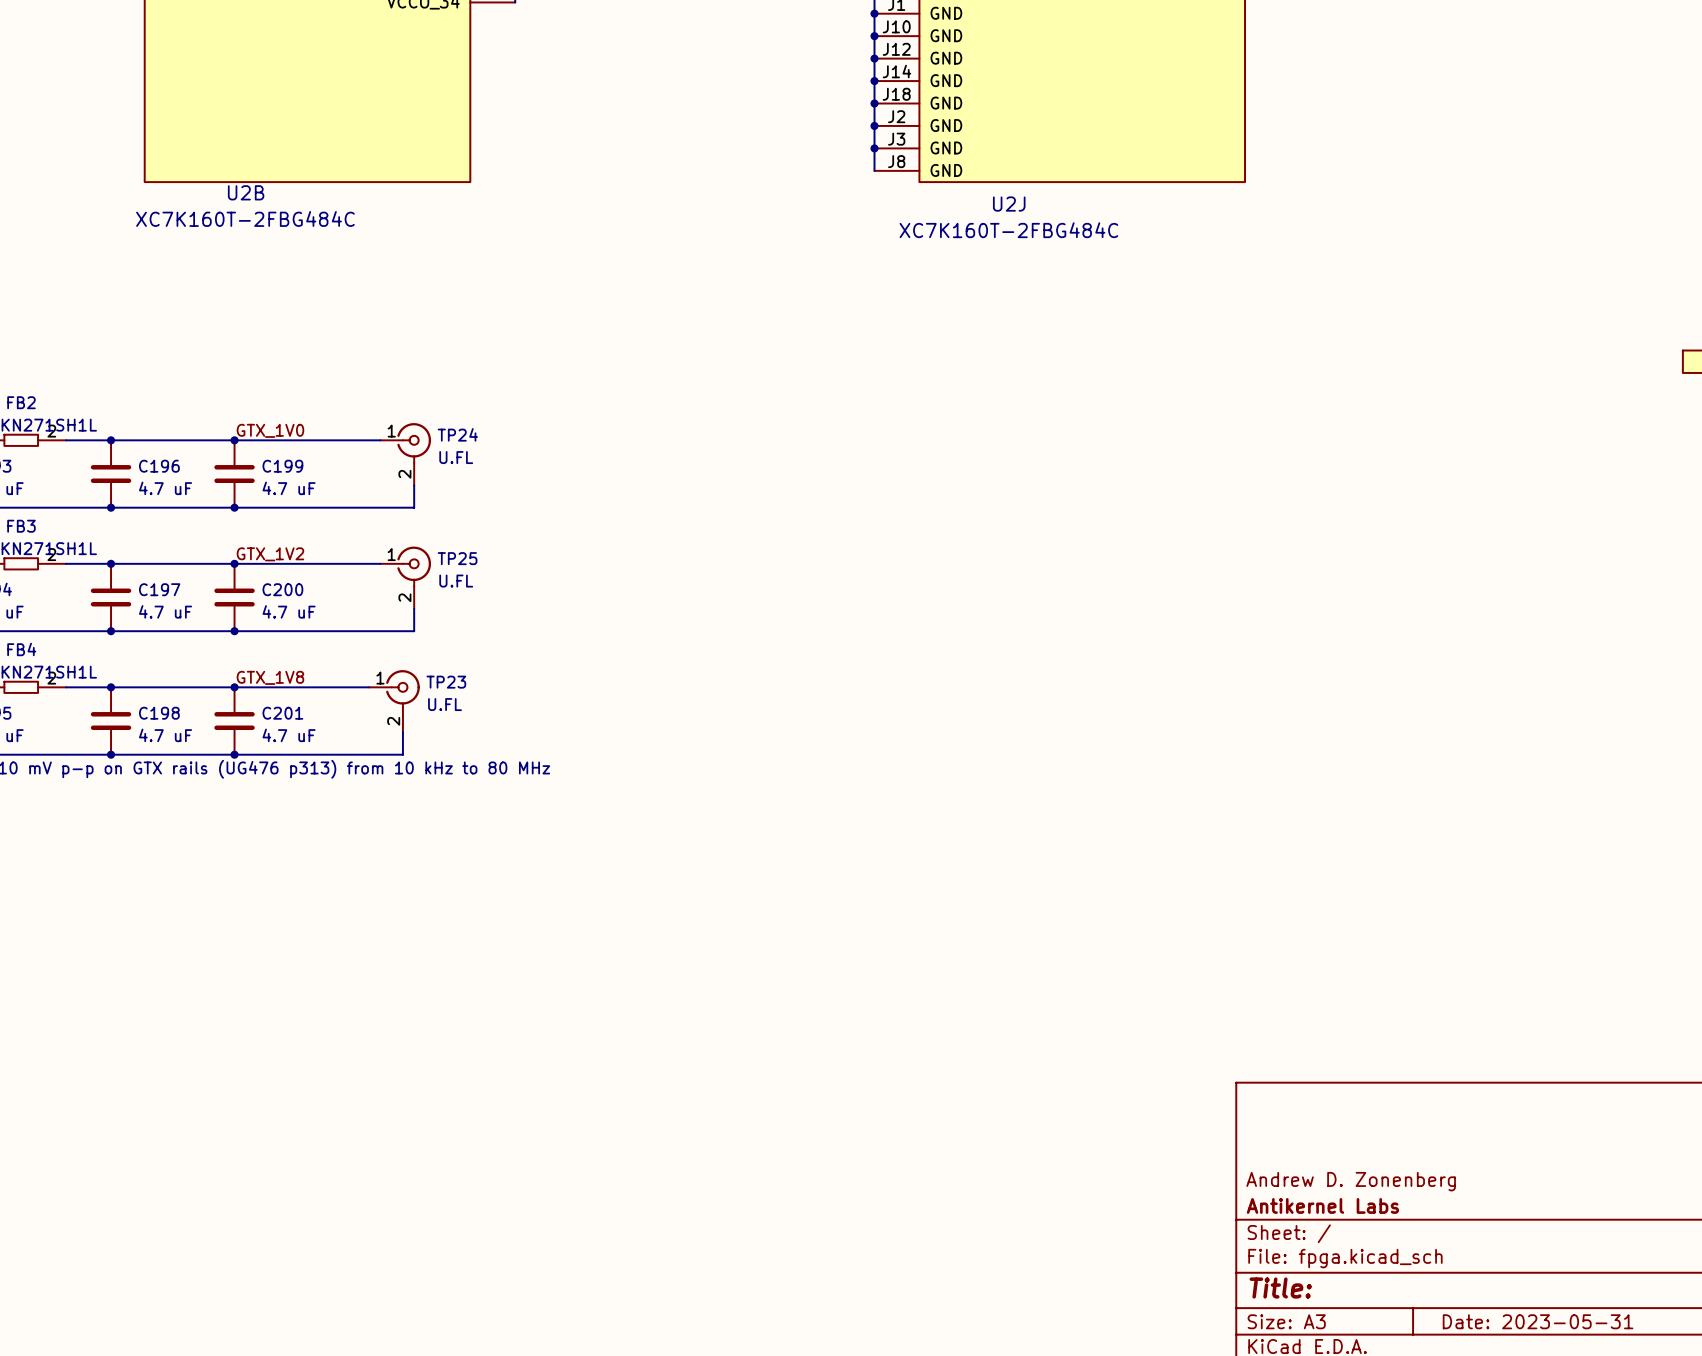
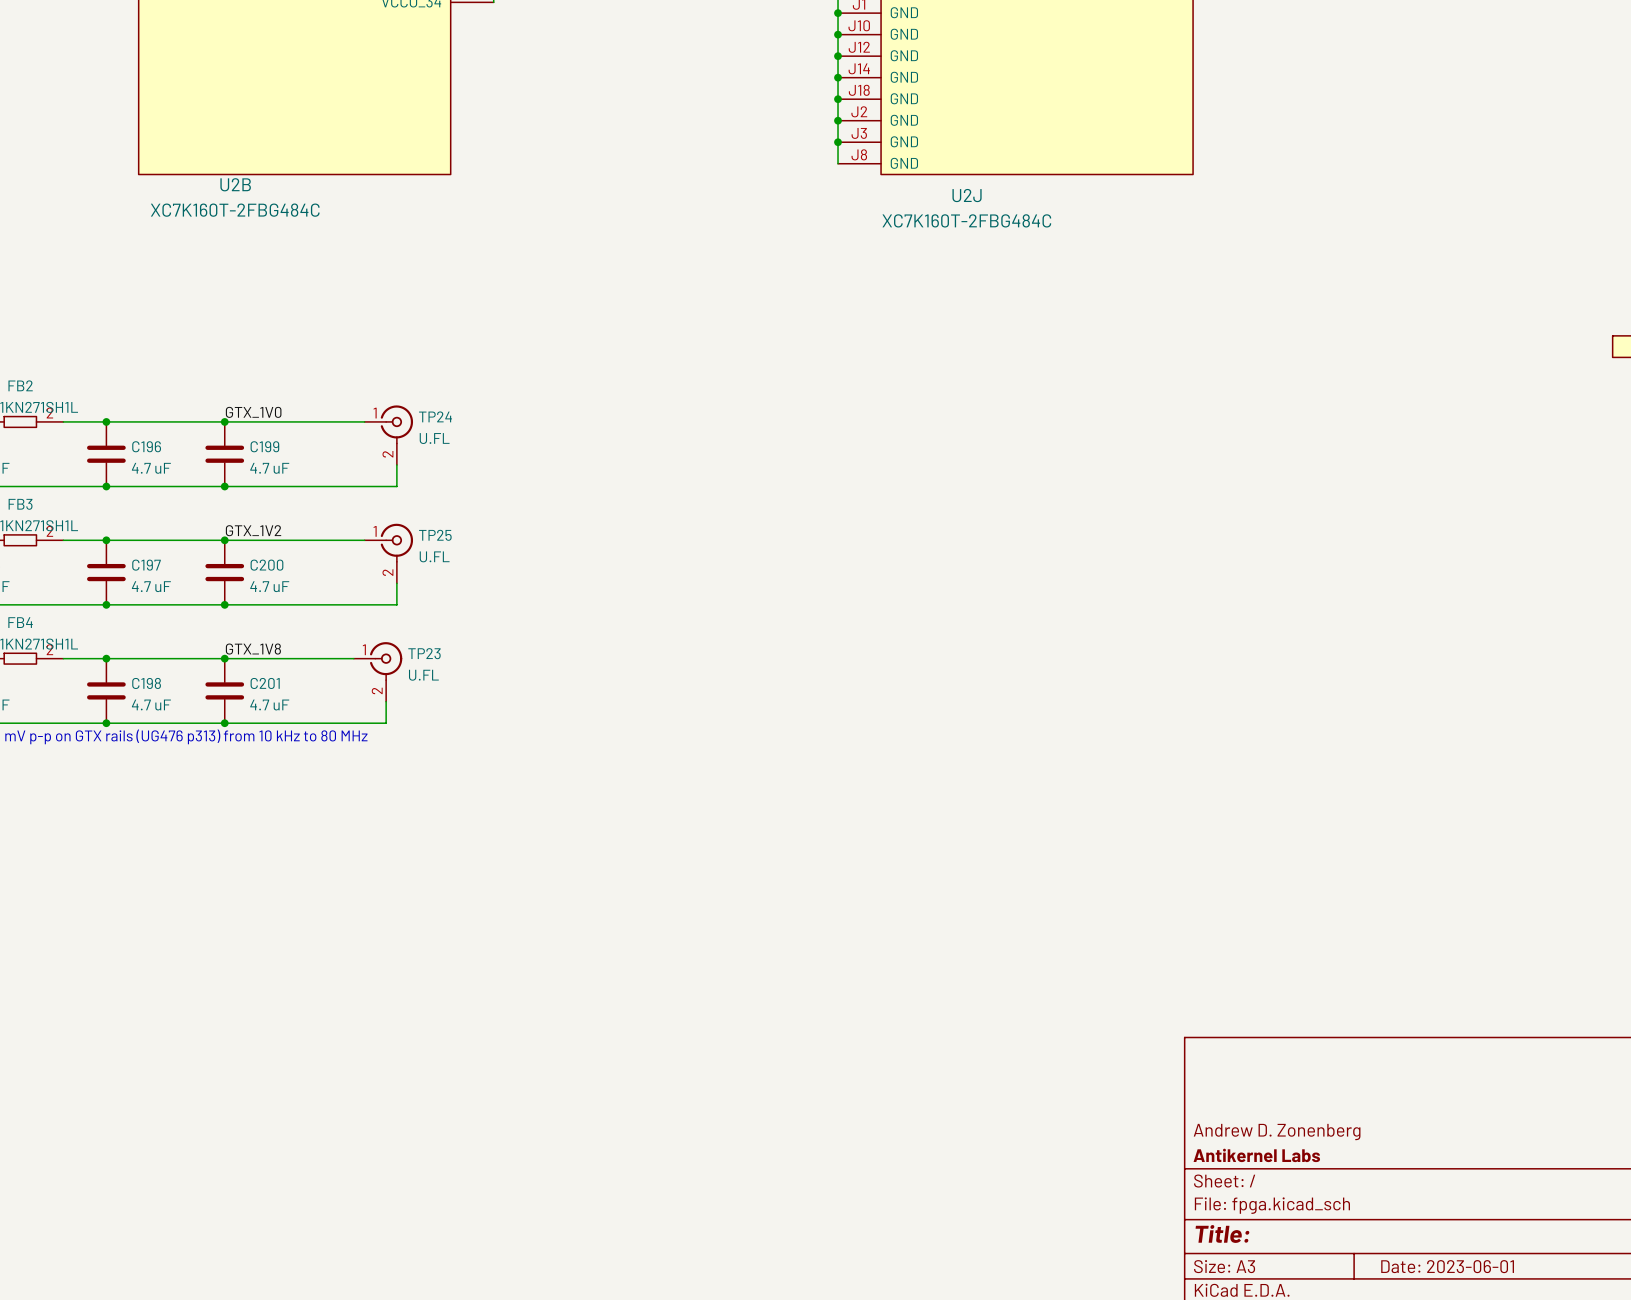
title block: Date: 2023-05-31 (1538, 1321) -> Date: 2023-06-01 (1447, 1266)

